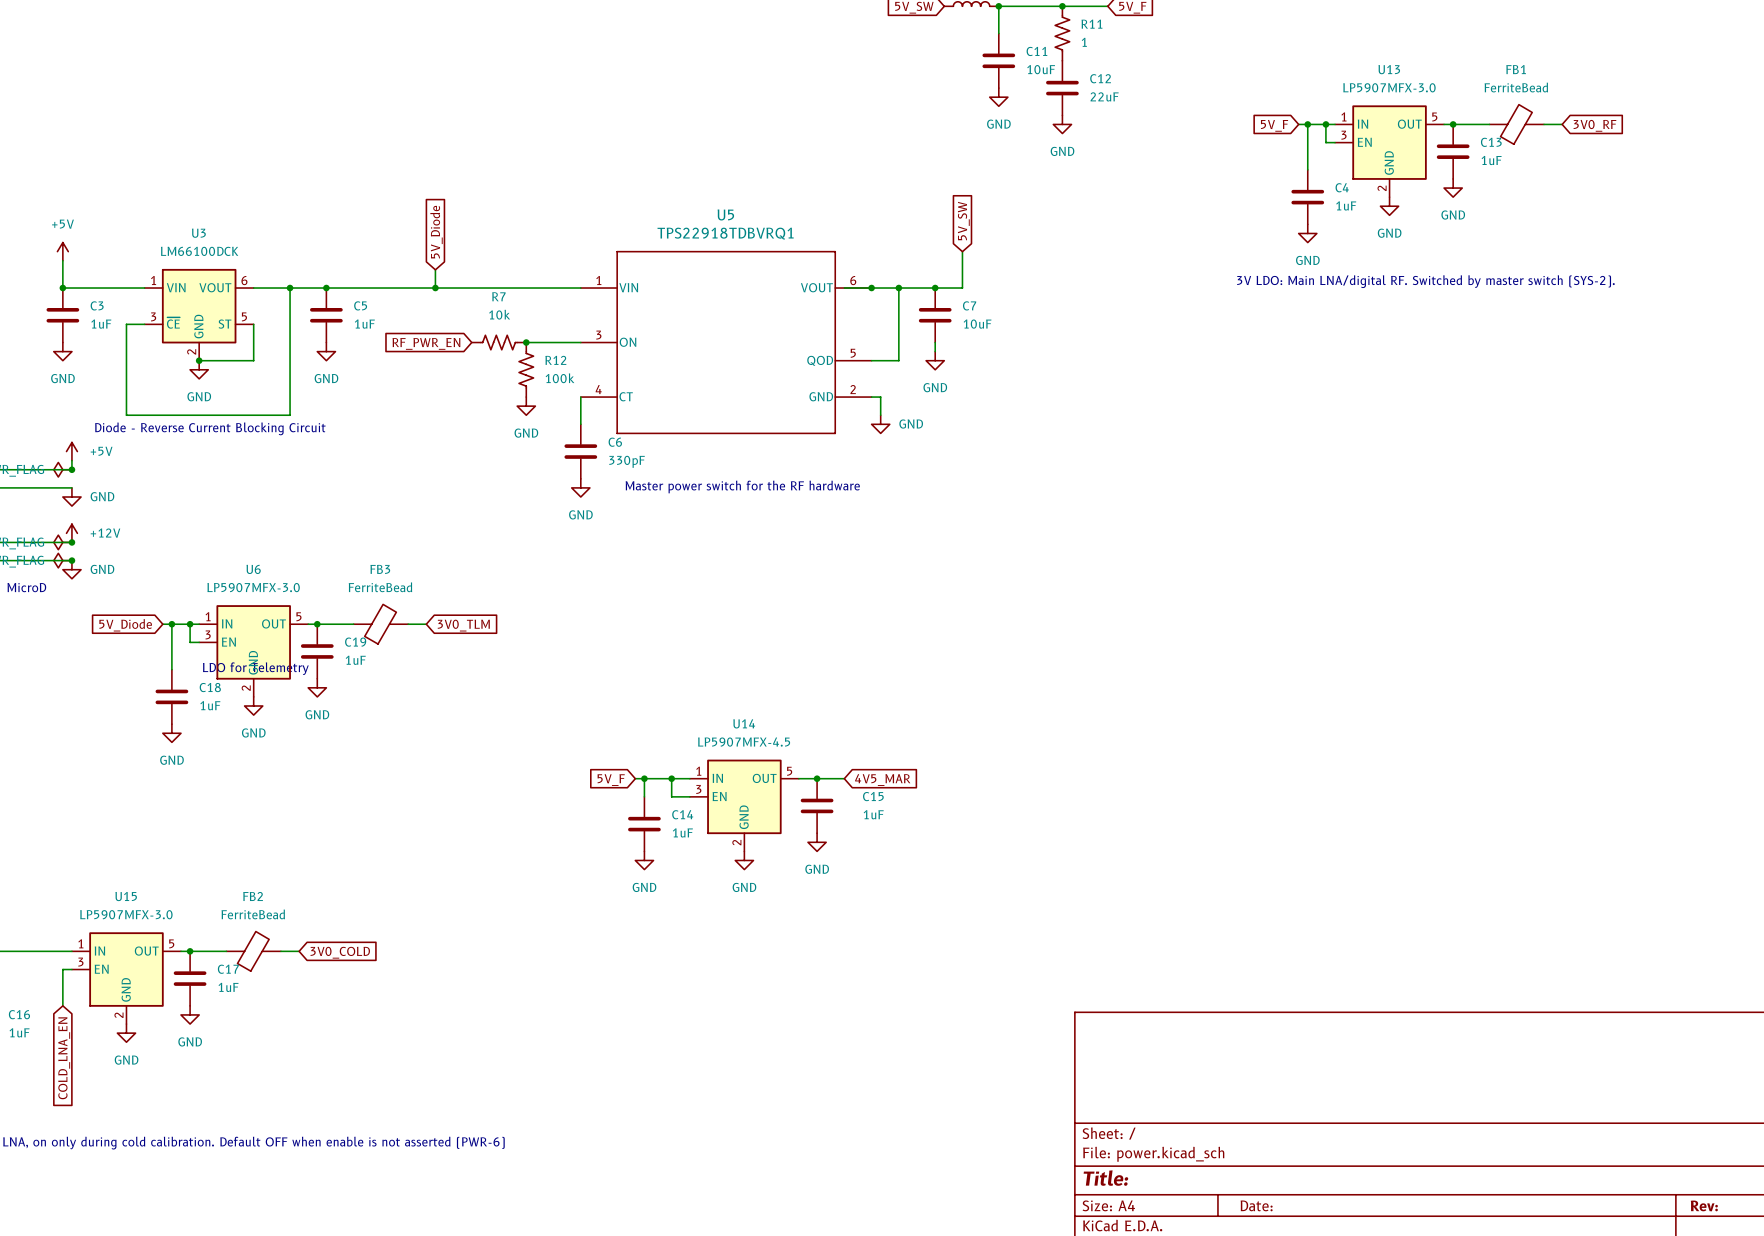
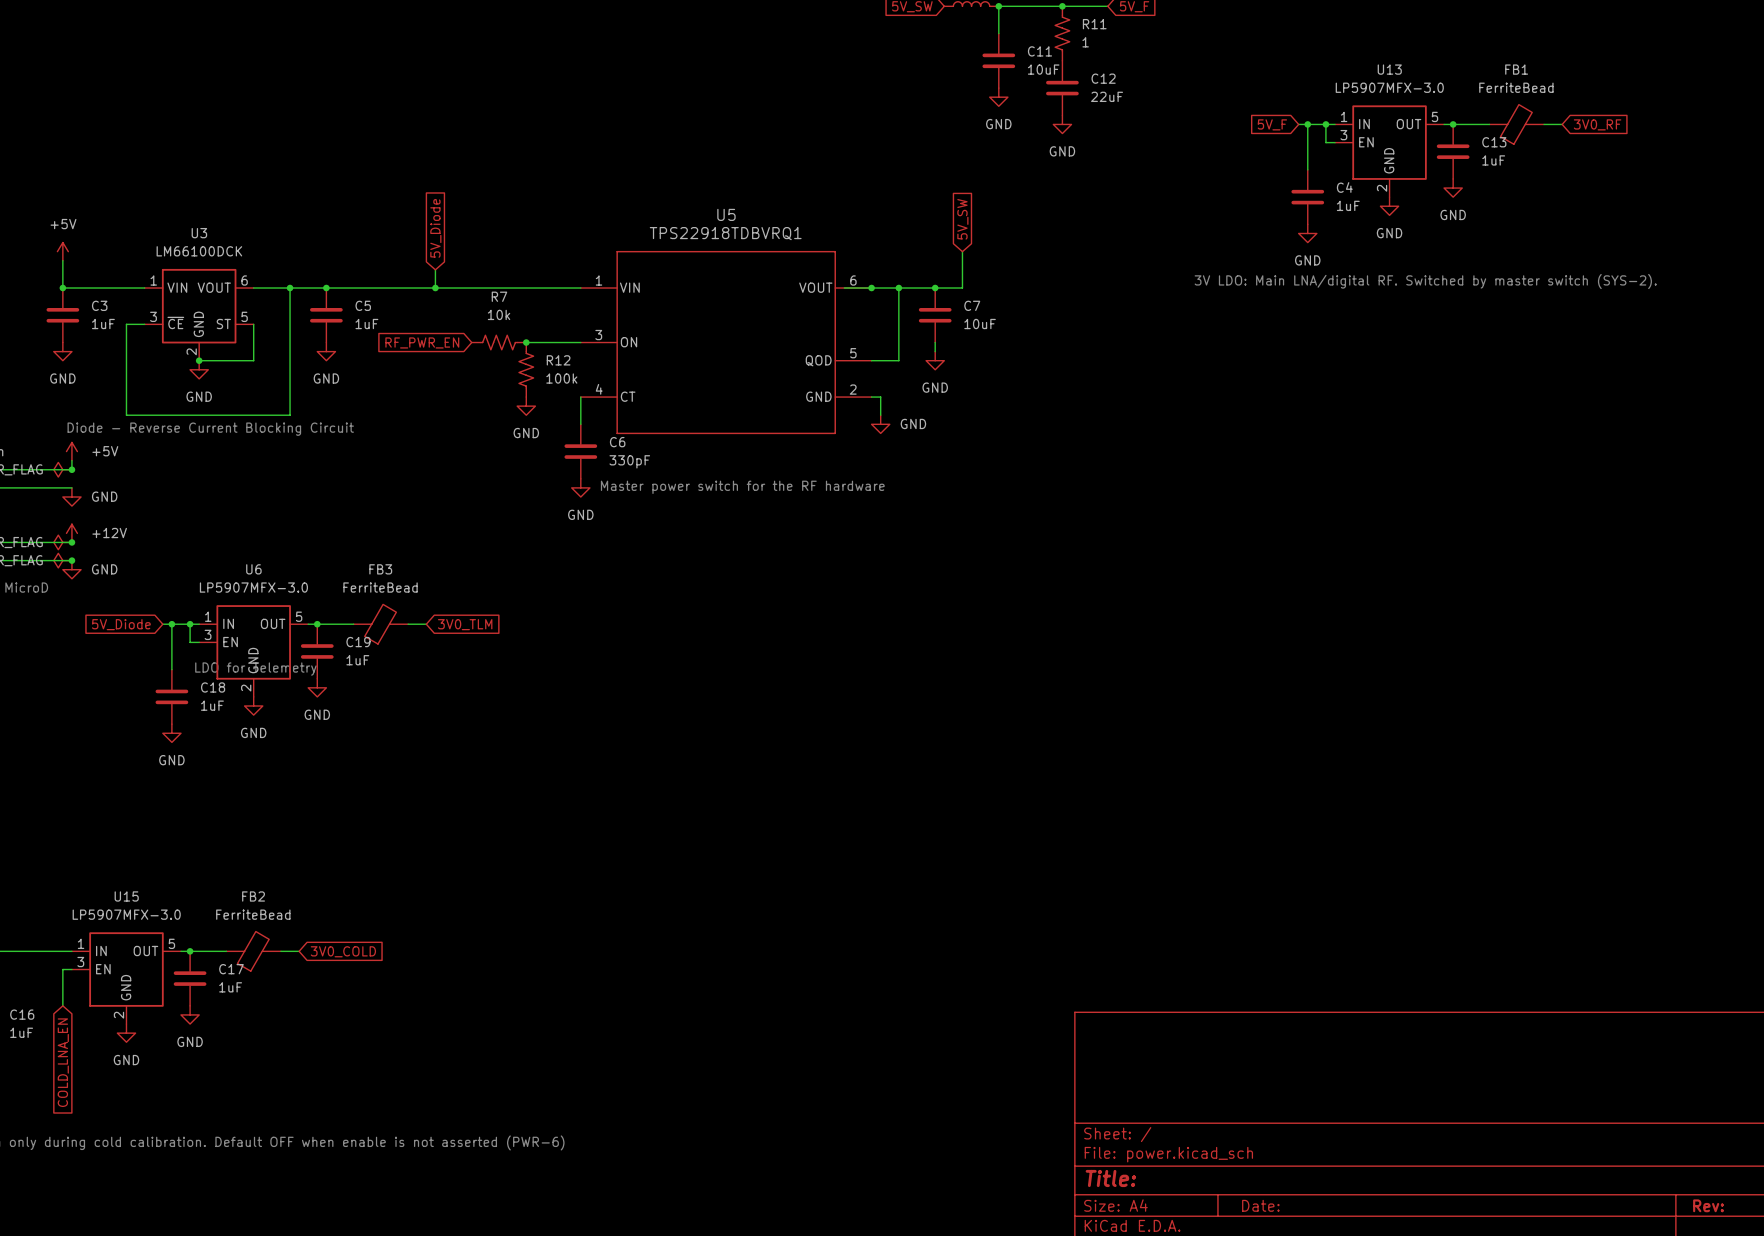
wire: (635, 778) (689, 778) -> none
wire: (644, 778) (644, 796) -> none
junction: (644, 778) -> none
wire: (671, 778) (671, 796) (689, 796) -> none
junction: (671, 778) -> none
wire: (798, 778) (844, 778) -> none
junction: (817, 778) -> none
global label: 5V_F (611, 780) -> none
global label: 4V5_MAR (882, 780) -> none
U14: LP5907MFX-4.5 (744, 805) -> none
C15: 1uF (817, 805) -> none
C14: 1uF (644, 824) -> none
power symbol: GND (817, 842) -> none
power symbol: GND (644, 860) -> none
power symbol: GND (744, 860) -> none

